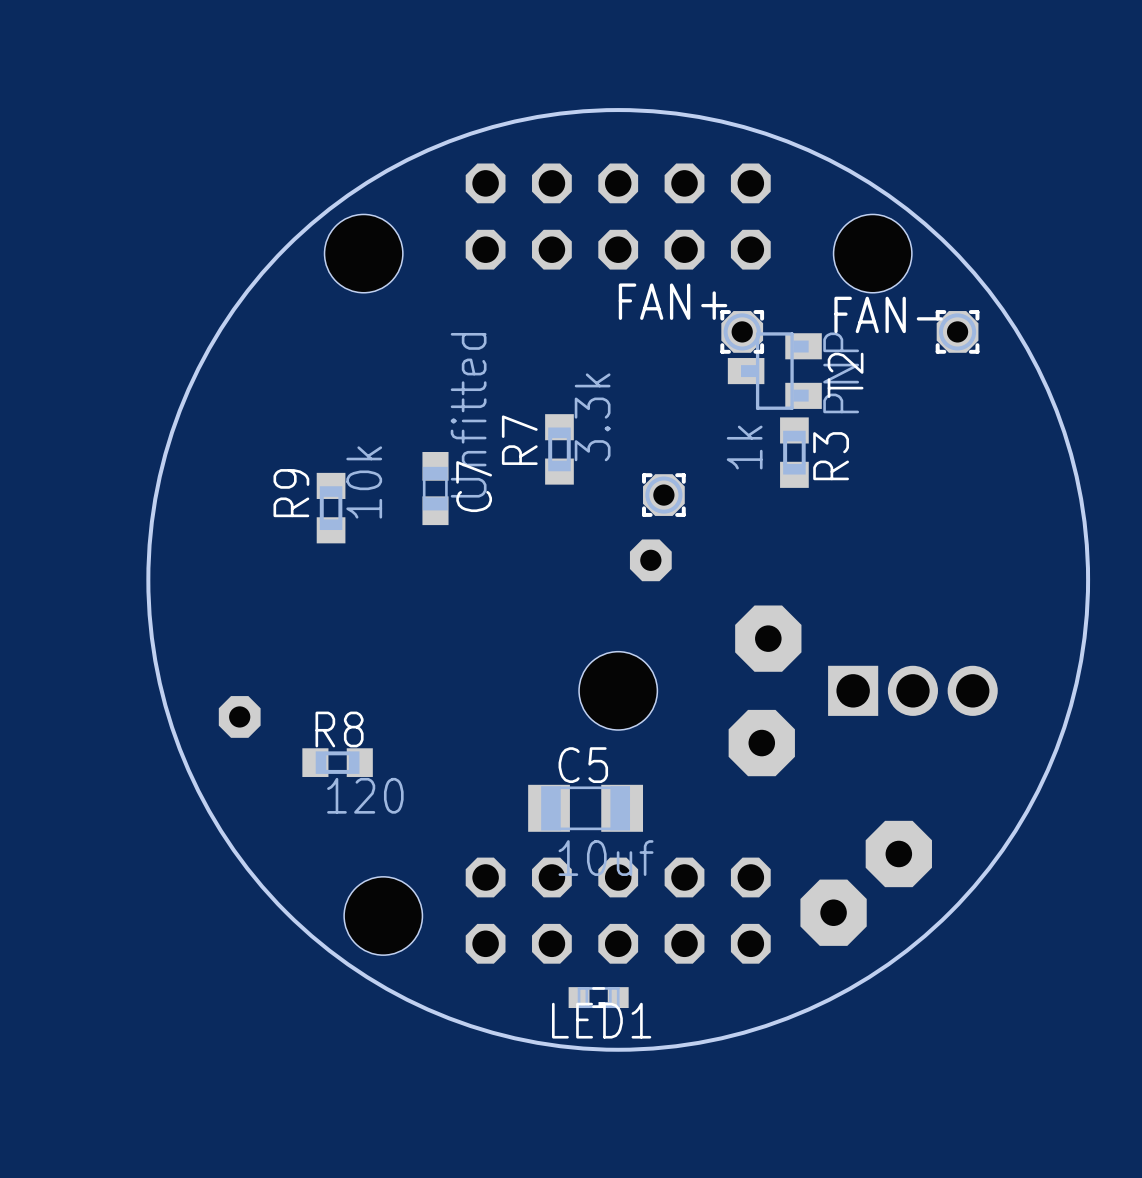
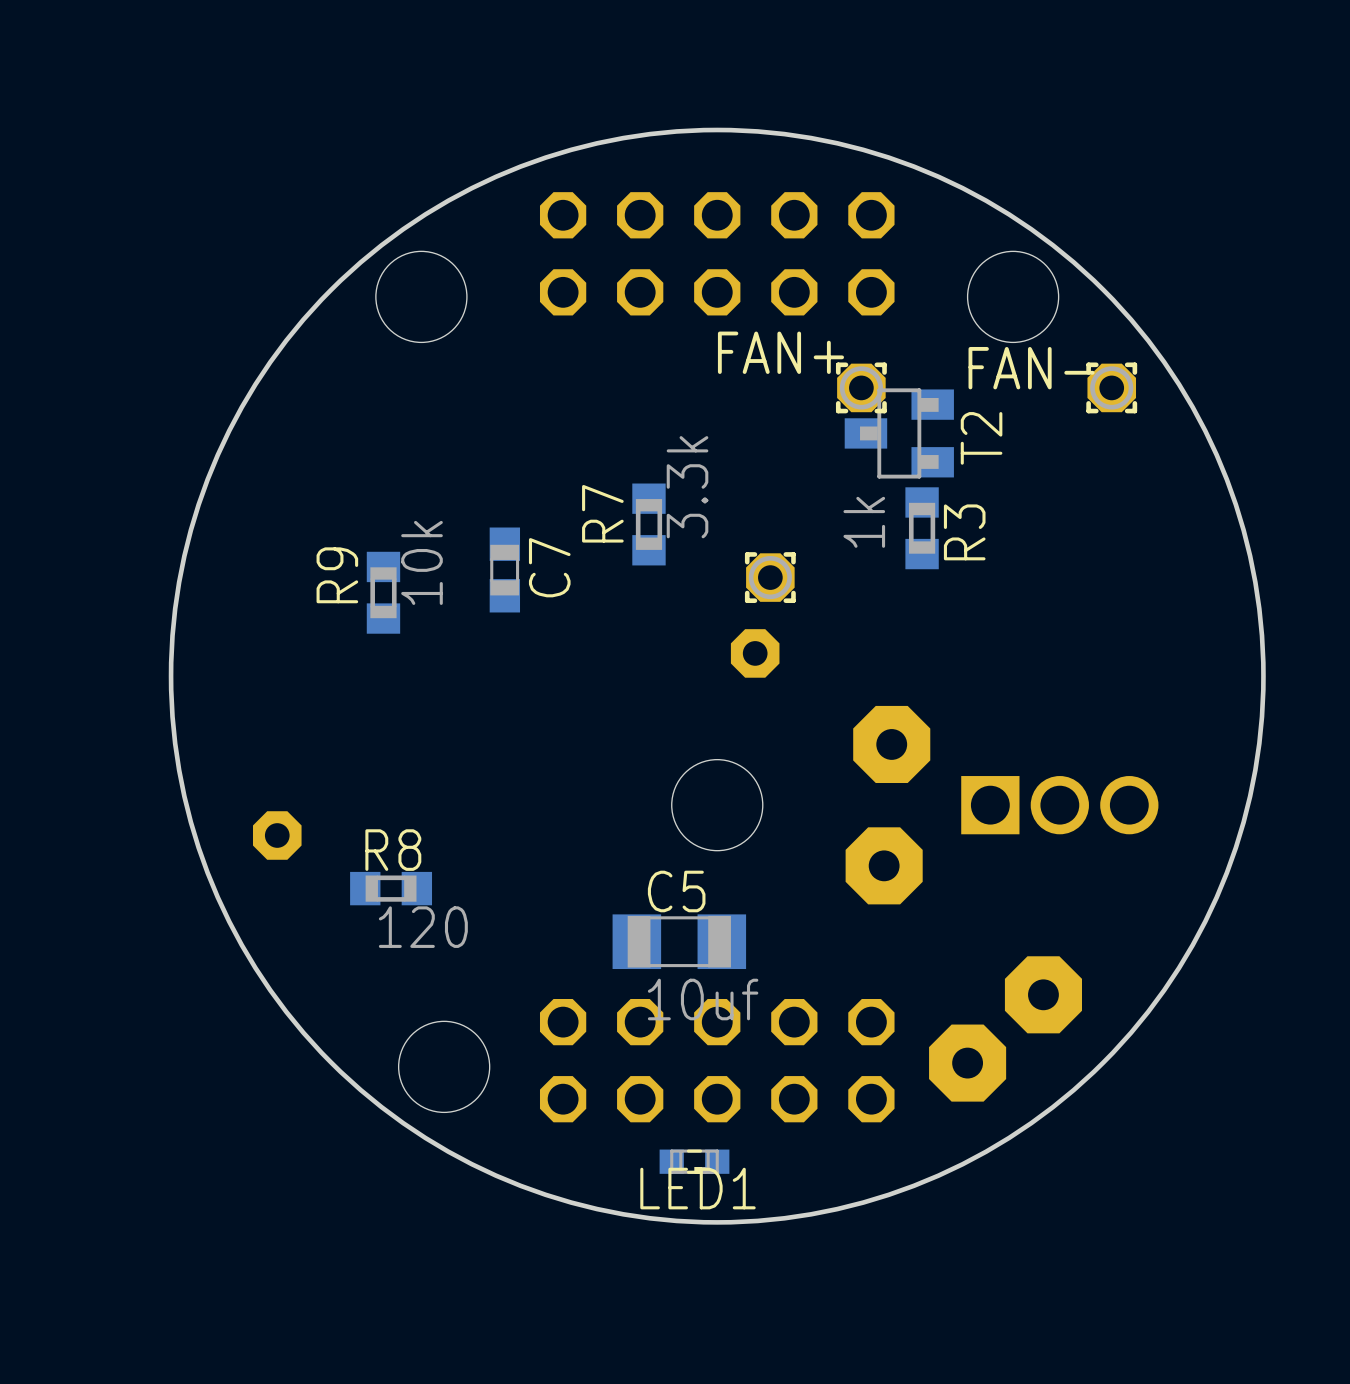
T2 value: PNP (841, 372) -> none
C7 value: Unfitted (468, 415) -> none

